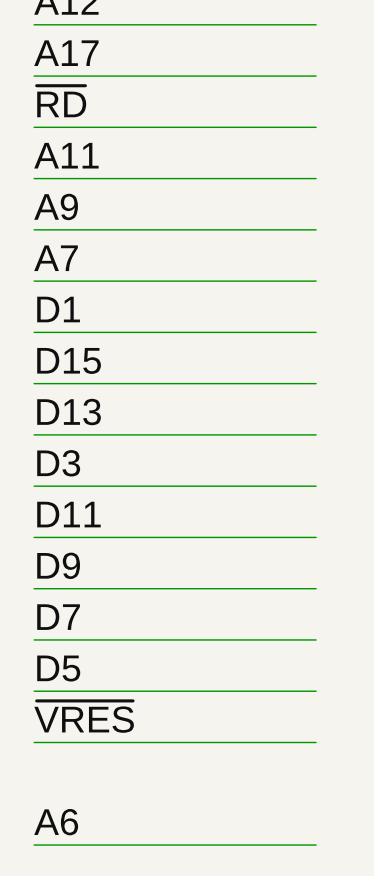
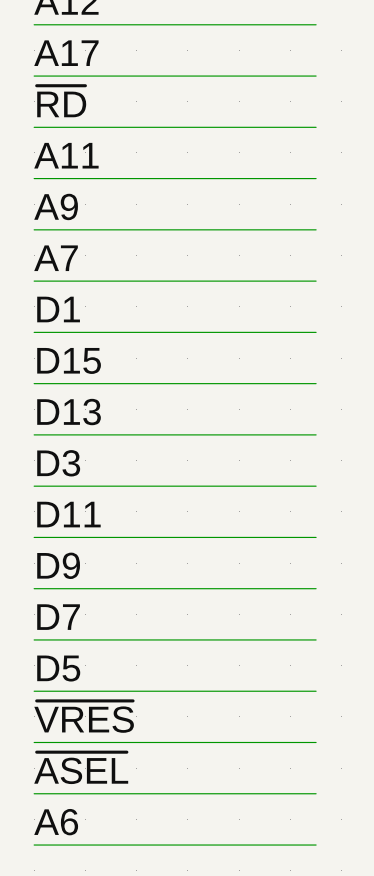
label: none -> ~{ASEL} (81, 768)
wire: none -> (34, 793) (316, 793)

